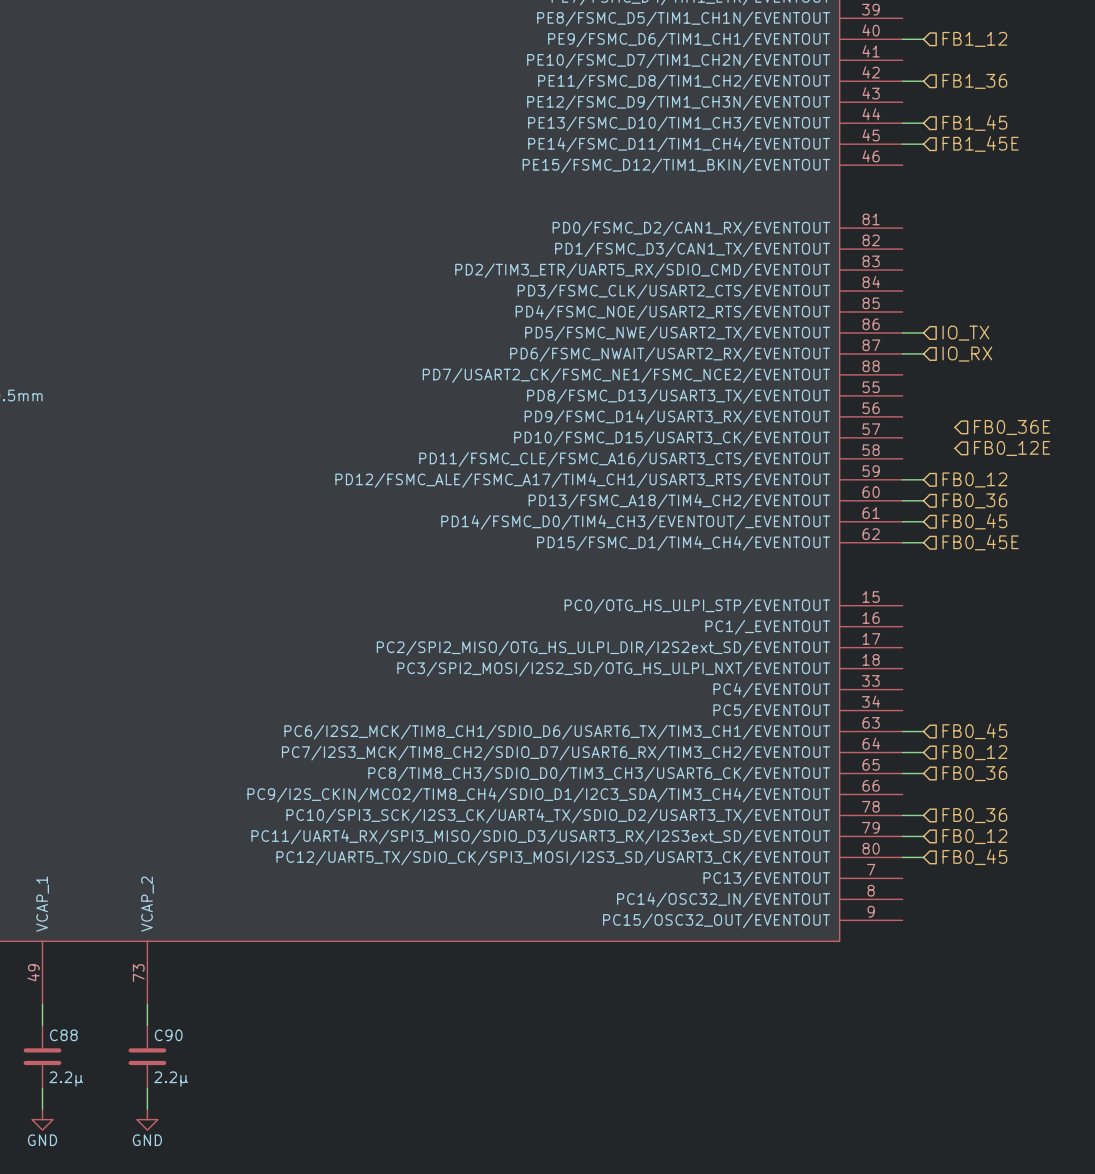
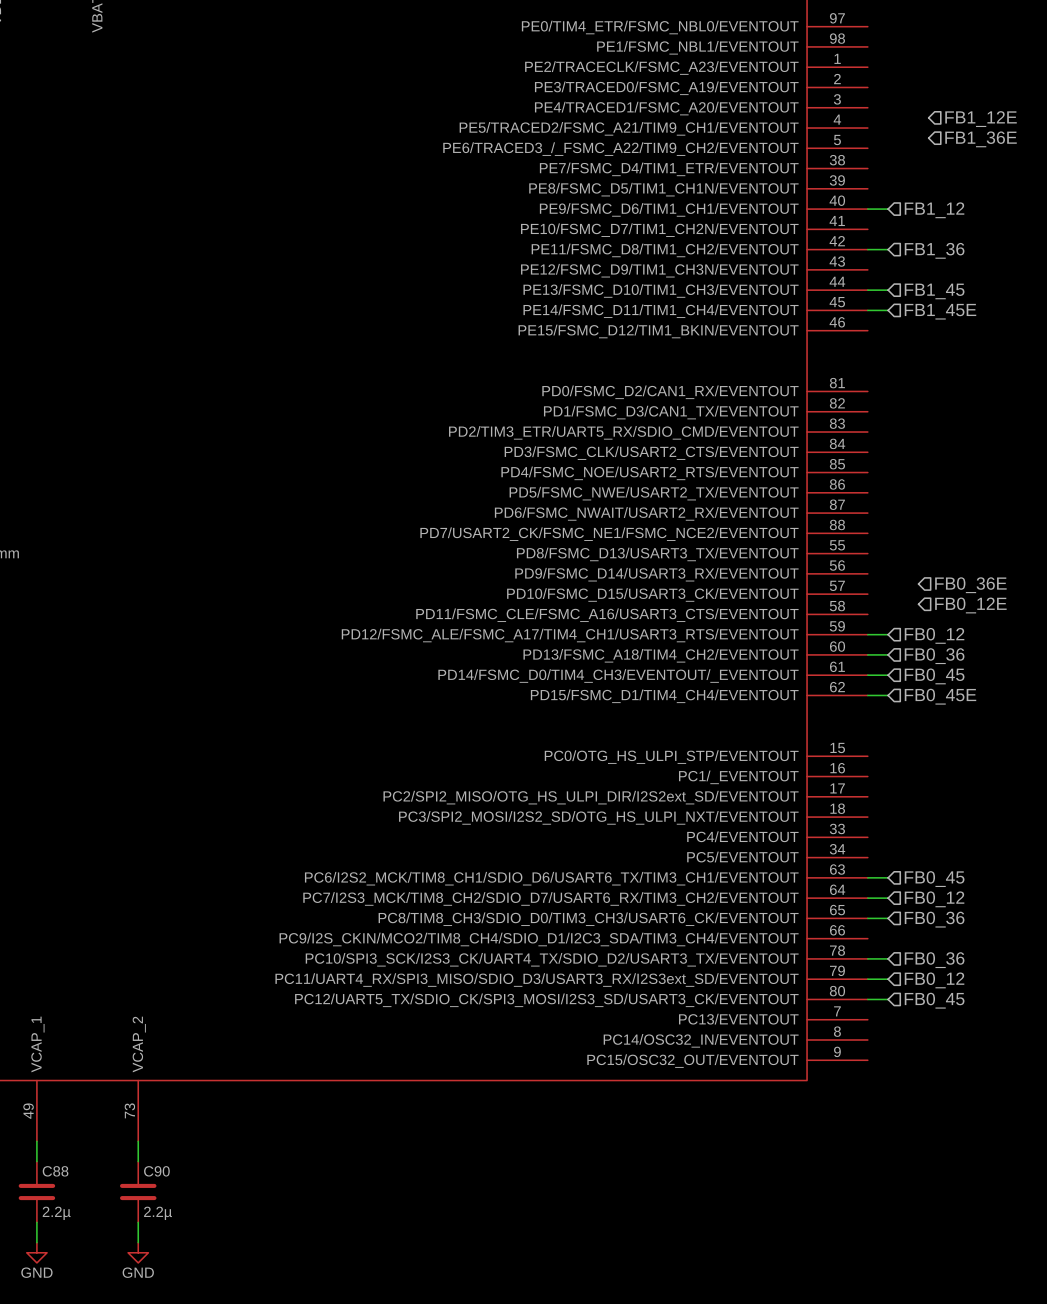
wire: (902, 332) (923, 332) -> none
hierarchical label: IO_TX (965, 333) -> none
wire: (902, 353) (923, 353) -> none
hierarchical label: IO_RX (967, 354) -> none

